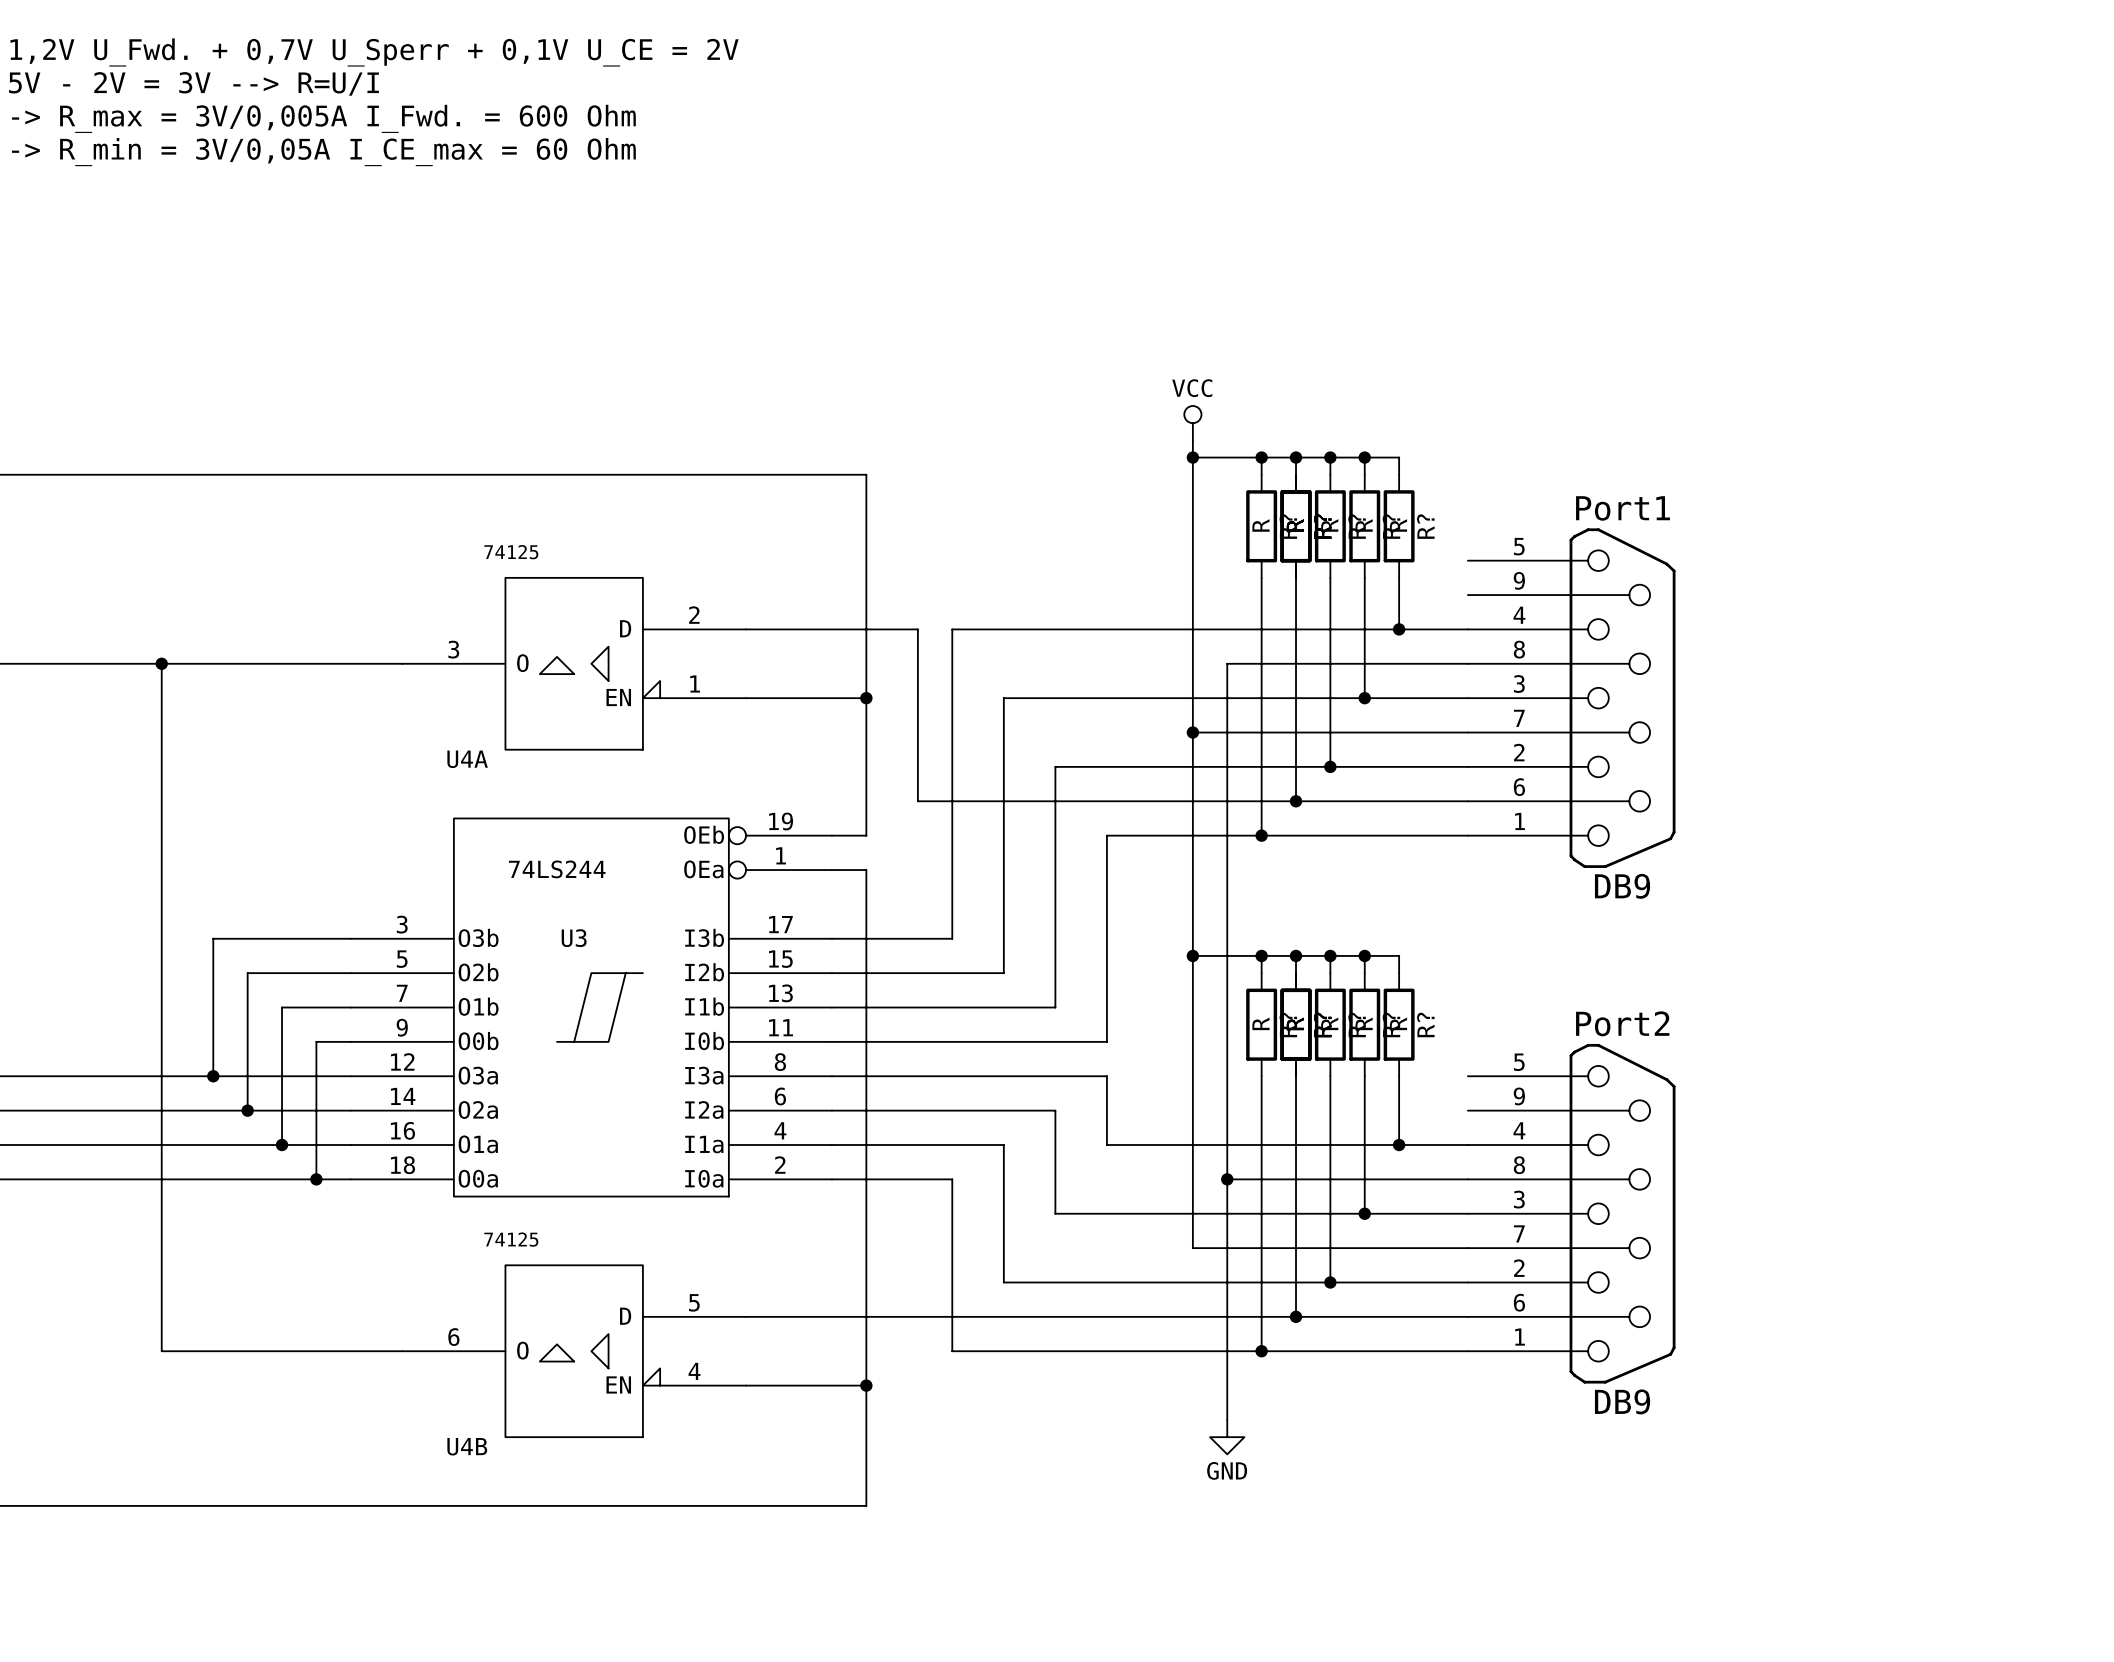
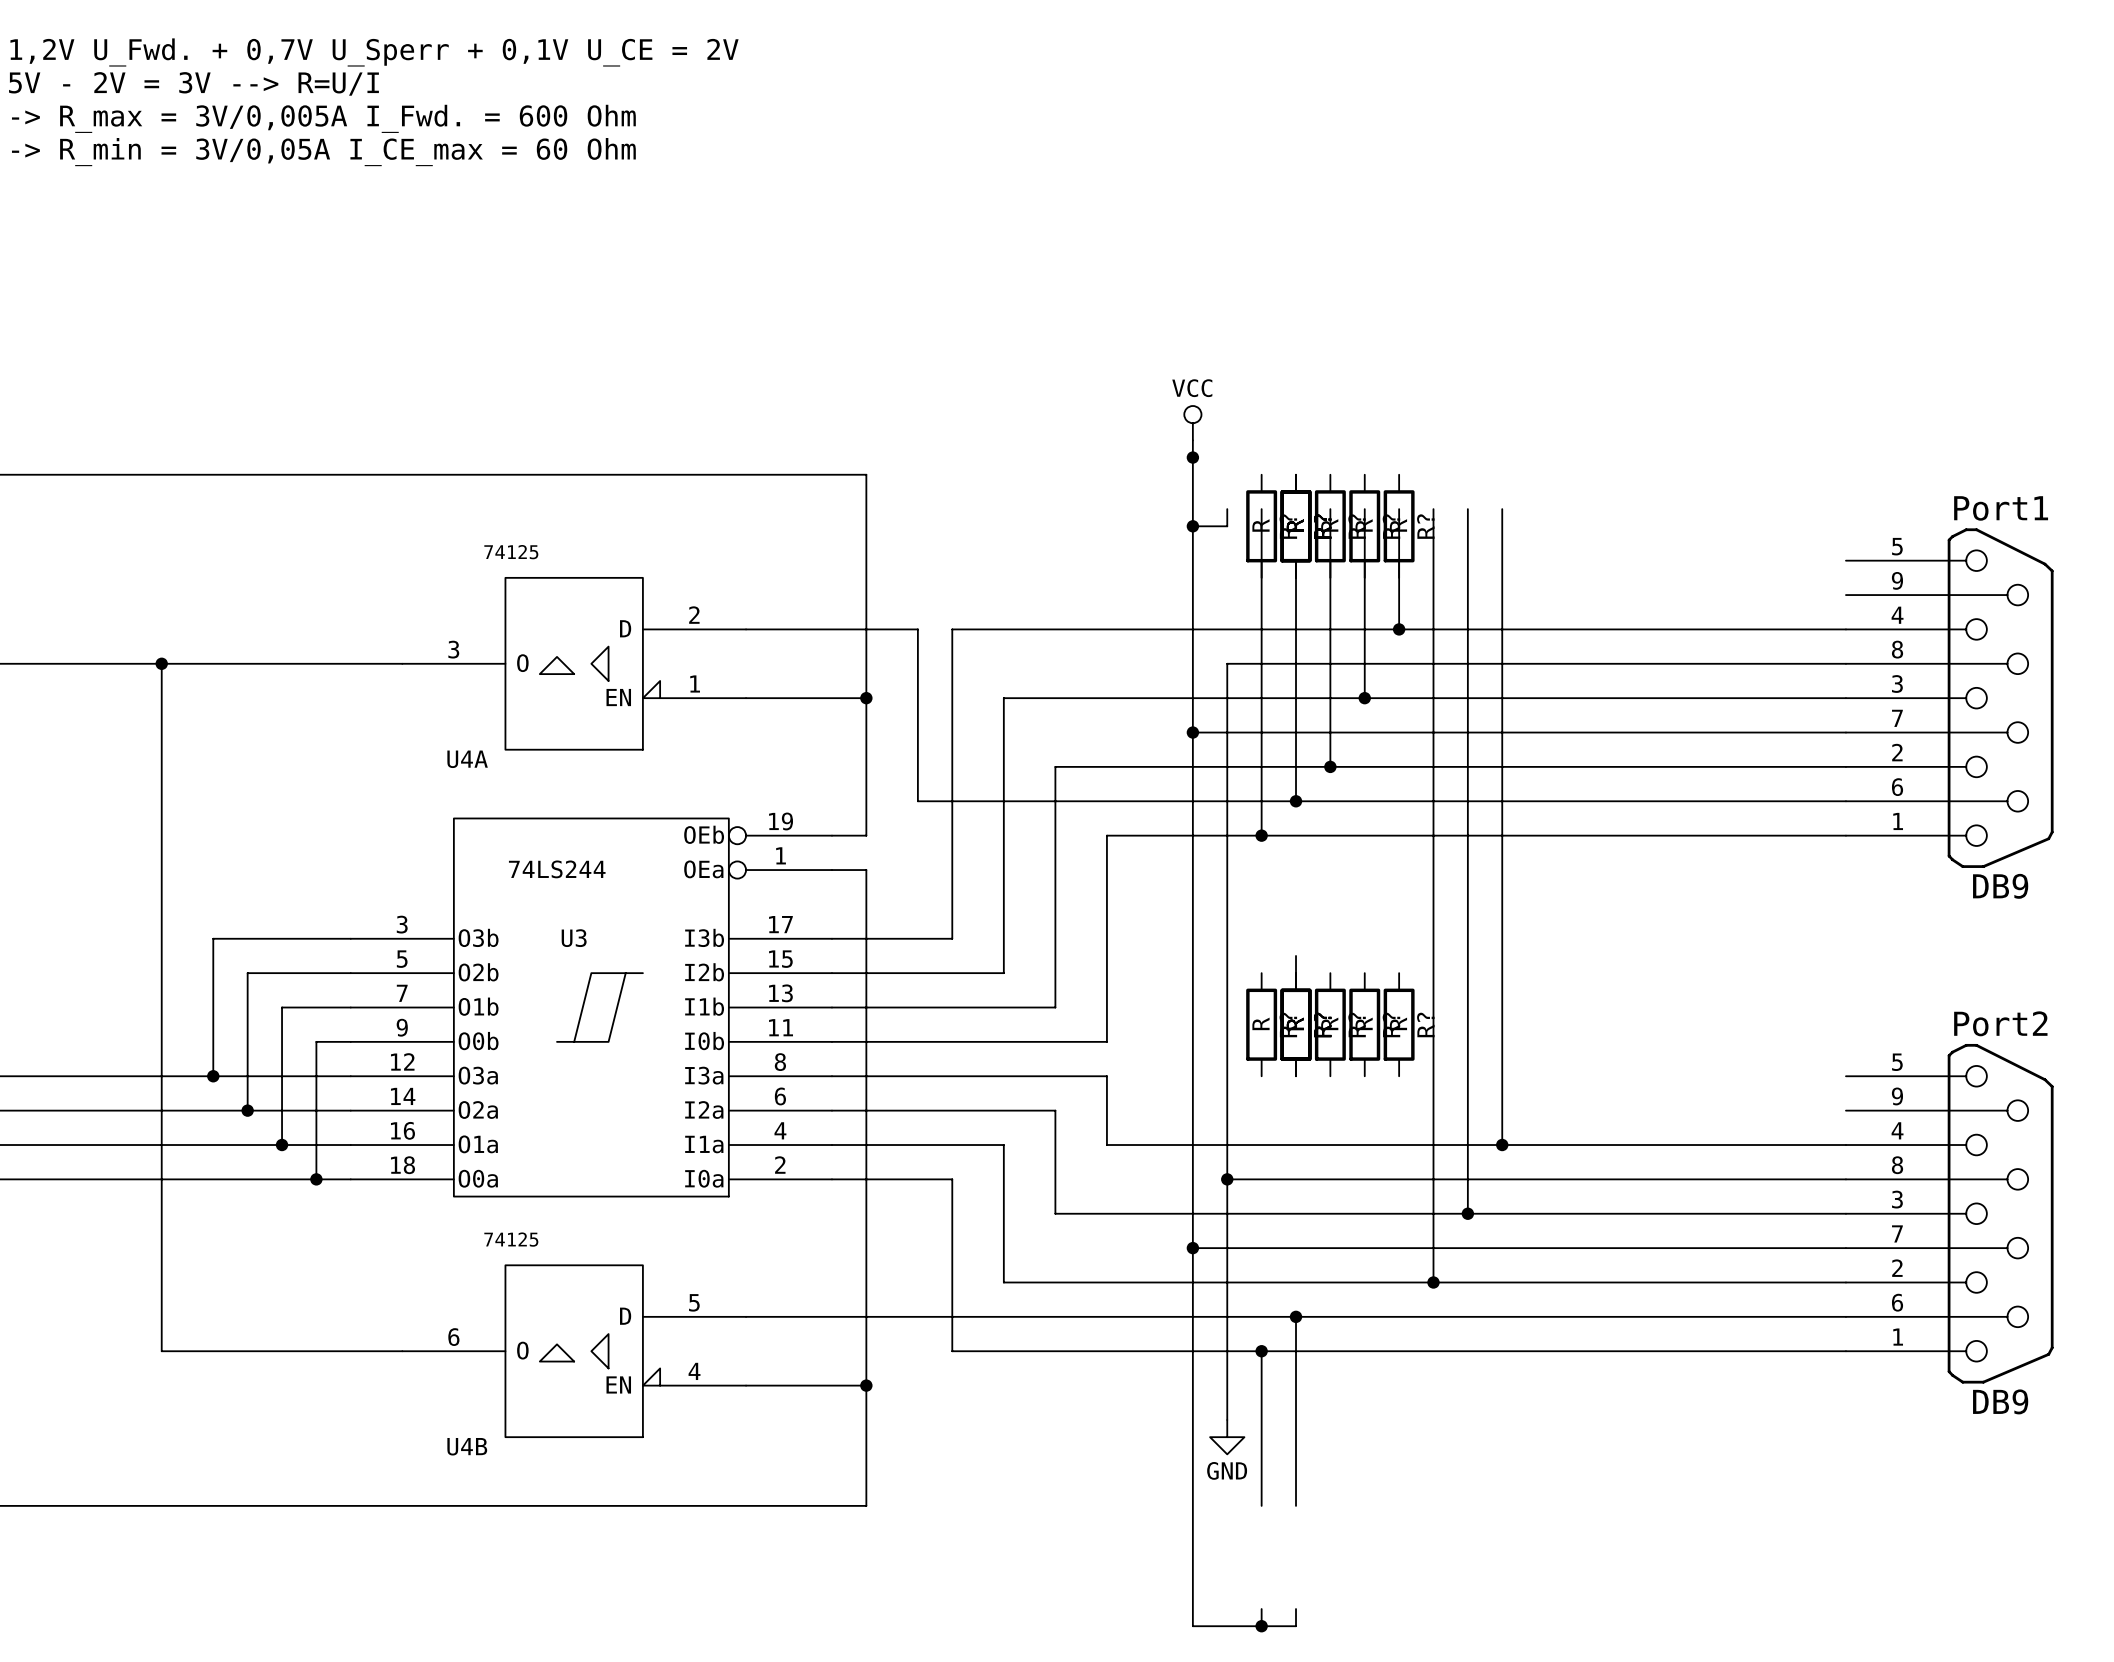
wire: (1192, 457) (1399, 457) (1399, 474) -> none
wire: (1261, 457) (1261, 474) -> none
junction: (1261, 457) -> none
wire: (1296, 457) (1296, 474) -> none
junction: (1296, 457) -> none
wire: (1330, 457) (1330, 474) -> none
junction: (1330, 457) -> none
wire: (1364, 457) (1364, 474) -> none
junction: (1364, 457) -> none
wire: none -> (1227, 509) (1227, 526) (1192, 526)
wire: none -> (1261, 509) (1261, 577)
wire: none -> (1330, 509) (1330, 577)
wire: none -> (1364, 509) (1364, 577)
wire: none -> (1399, 509) (1399, 577)
wire: none -> (1433, 509) (1433, 1282)
wire: none -> (1467, 509) (1467, 1213) (1845, 1213)
wire: none -> (1502, 509) (1502, 1145)
junction: none -> (1192, 526)
wire: none -> (1467, 629) (1845, 629)
wire: none -> (1467, 663) (1845, 663)
wire: none -> (1467, 698) (1845, 698)
Port1 position: (1571, 698) -> (1949, 698)
wire: none -> (1467, 732) (1845, 732)
wire: none -> (1467, 766) (1845, 766)
wire: none -> (1467, 801) (1845, 801)
wire: none -> (1467, 835) (1845, 835)
wire: (1192, 955) (1399, 955) (1399, 973) -> none
junction: (1192, 955) -> none
wire: (1261, 955) (1261, 973) -> none
junction: (1261, 955) -> none
junction: (1296, 955) -> none
wire: (1330, 955) (1330, 973) -> none
junction: (1330, 955) -> none
wire: (1364, 955) (1364, 973) -> none
junction: (1364, 955) -> none
wire: (1261, 1076) (1261, 1351) -> (1261, 1505) (1261, 1351)
wire: (1296, 1076) (1296, 1316) -> (1296, 1505) (1296, 1316)
wire: (1330, 1076) (1330, 1282) -> none
wire: (1364, 1076) (1364, 1213) -> none
wire: (1399, 1076) (1399, 1145) -> none
junction: (1399, 1145) -> none
wire: none -> (1467, 1145) (1845, 1145)
junction: none -> (1502, 1145)
wire: none -> (1467, 1179) (1845, 1179)
junction: (1364, 1213) -> none
junction: none -> (1467, 1213)
Port2 position: (1571, 1213) -> (1949, 1213)
wire: none -> (1192, 1248) (1192, 1626) (1296, 1626) (1296, 1609)
junction: none -> (1192, 1248)
wire: none -> (1467, 1248) (1845, 1248)
junction: (1330, 1282) -> none
junction: none -> (1433, 1282)
wire: none -> (1467, 1282) (1845, 1282)
wire: none -> (1467, 1316) (1845, 1316)
wire: none -> (1467, 1351) (1845, 1351)
wire: none -> (1261, 1609) (1261, 1626)
junction: none -> (1261, 1626)

